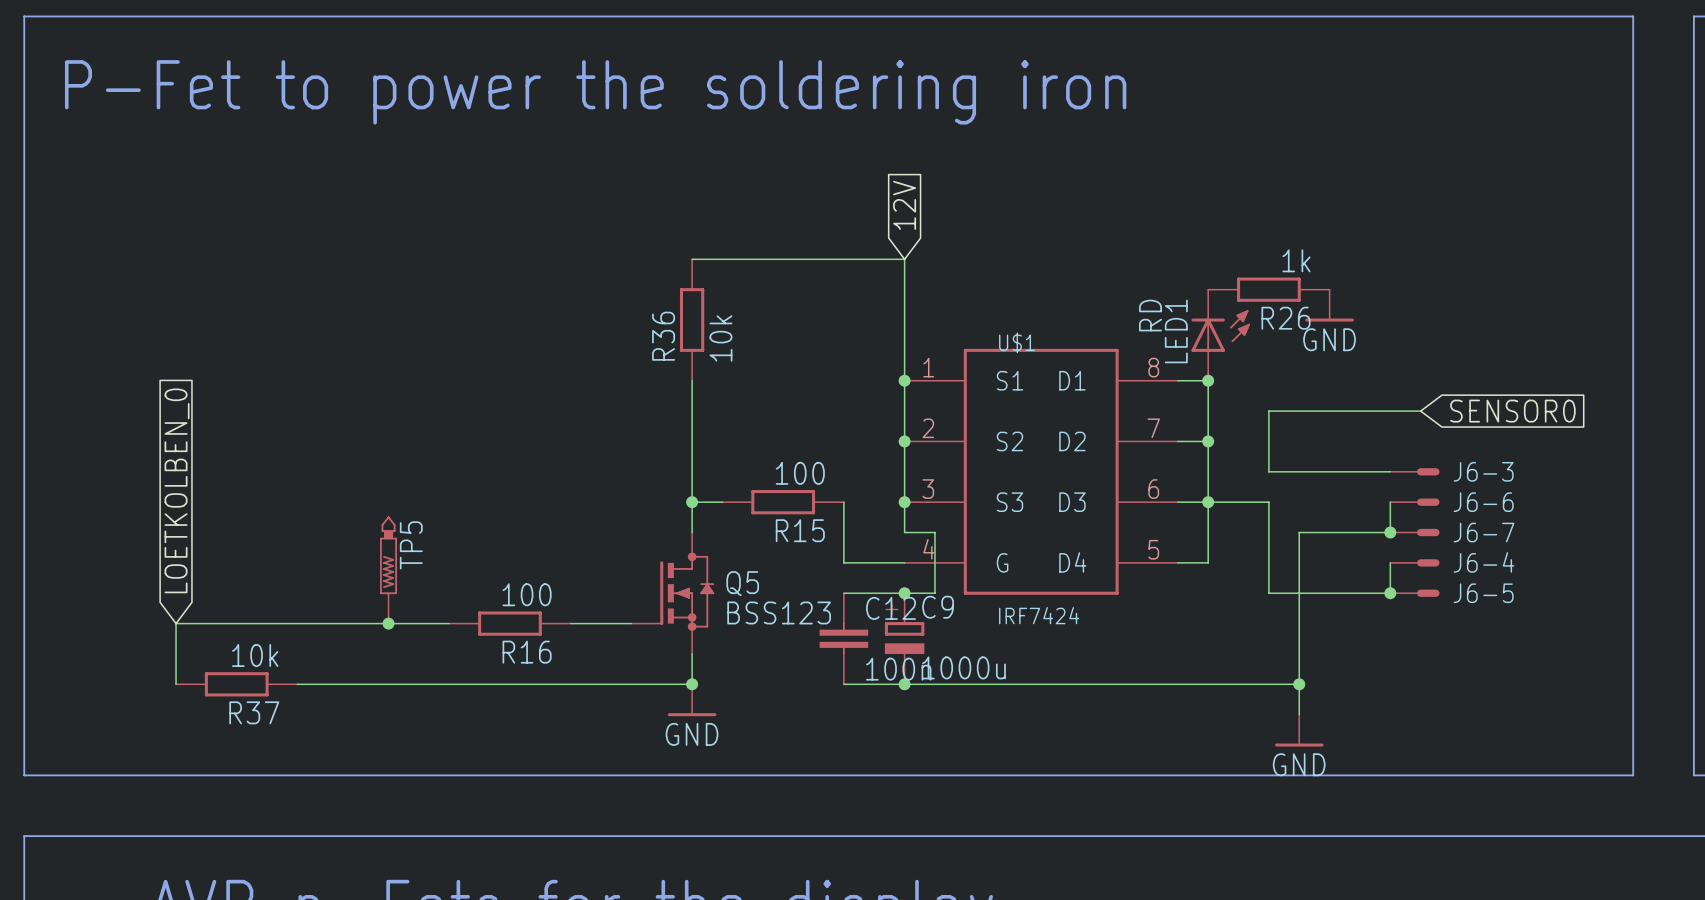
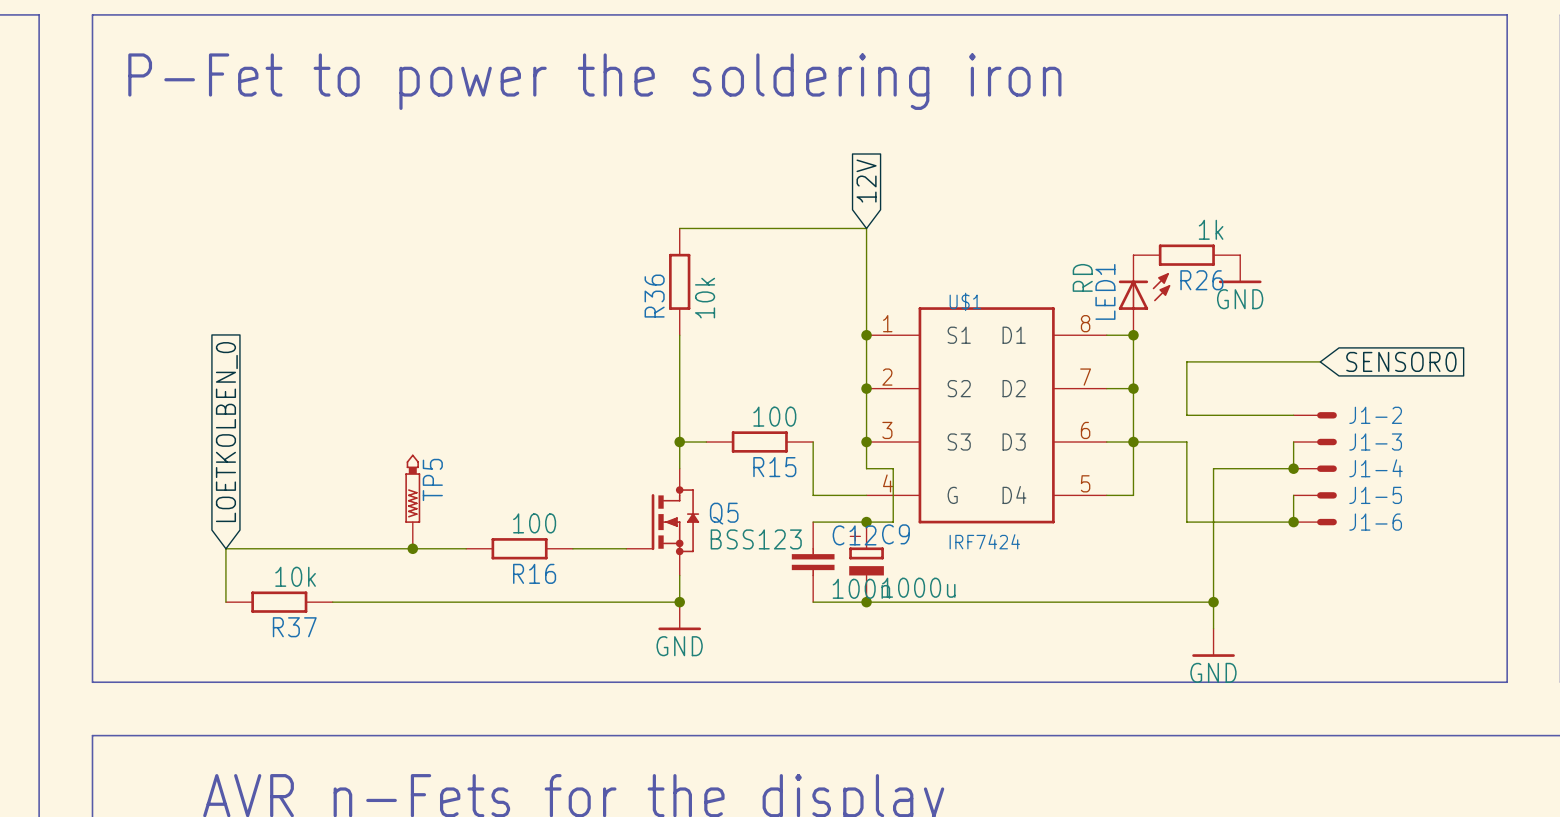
J6-3 name: J6-3 (1483, 471) -> J1-2 (1375, 415)
J6-6 name: J6-6 (1483, 502) -> J1-3 (1375, 442)
J6-7 name: J6-7 (1484, 532) -> J1-4 (1375, 468)
J6-4 name: J6-4 (1484, 562) -> J1-5 (1375, 495)
J6-5 name: J6-5 (1483, 593) -> J1-6 (1375, 522)

